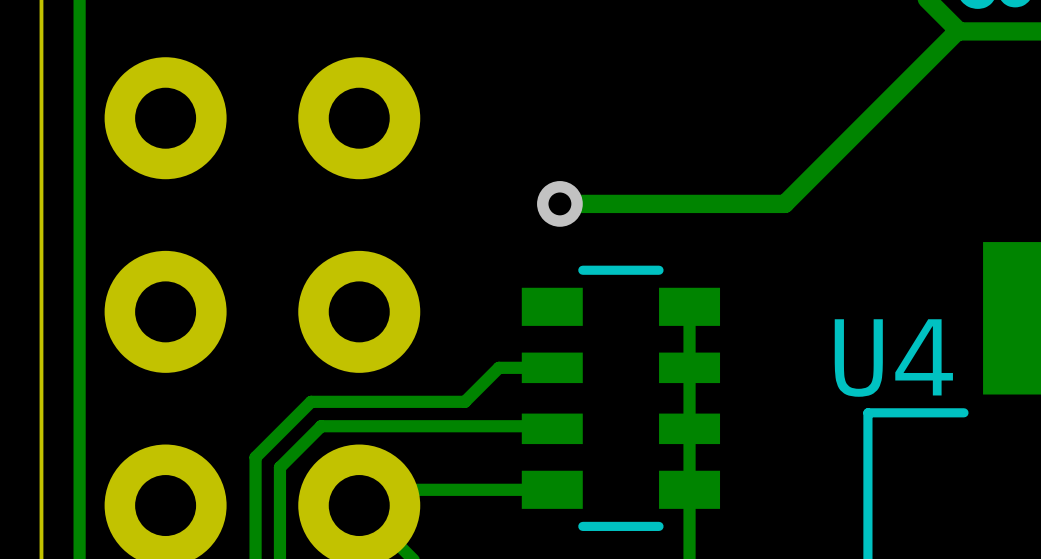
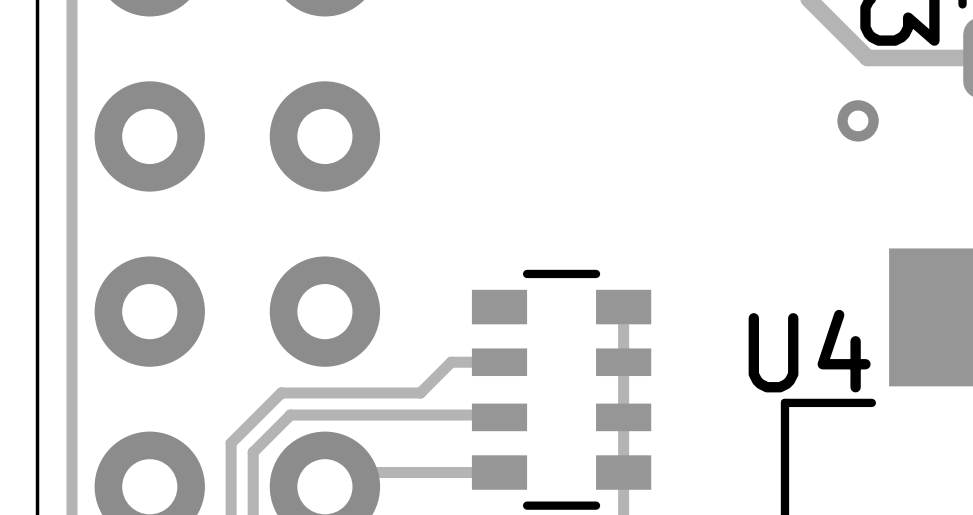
track: (959, 31) (784, 203) (559, 203) -> none
via: none -> (858, 120)
via: (559, 203) -> none

